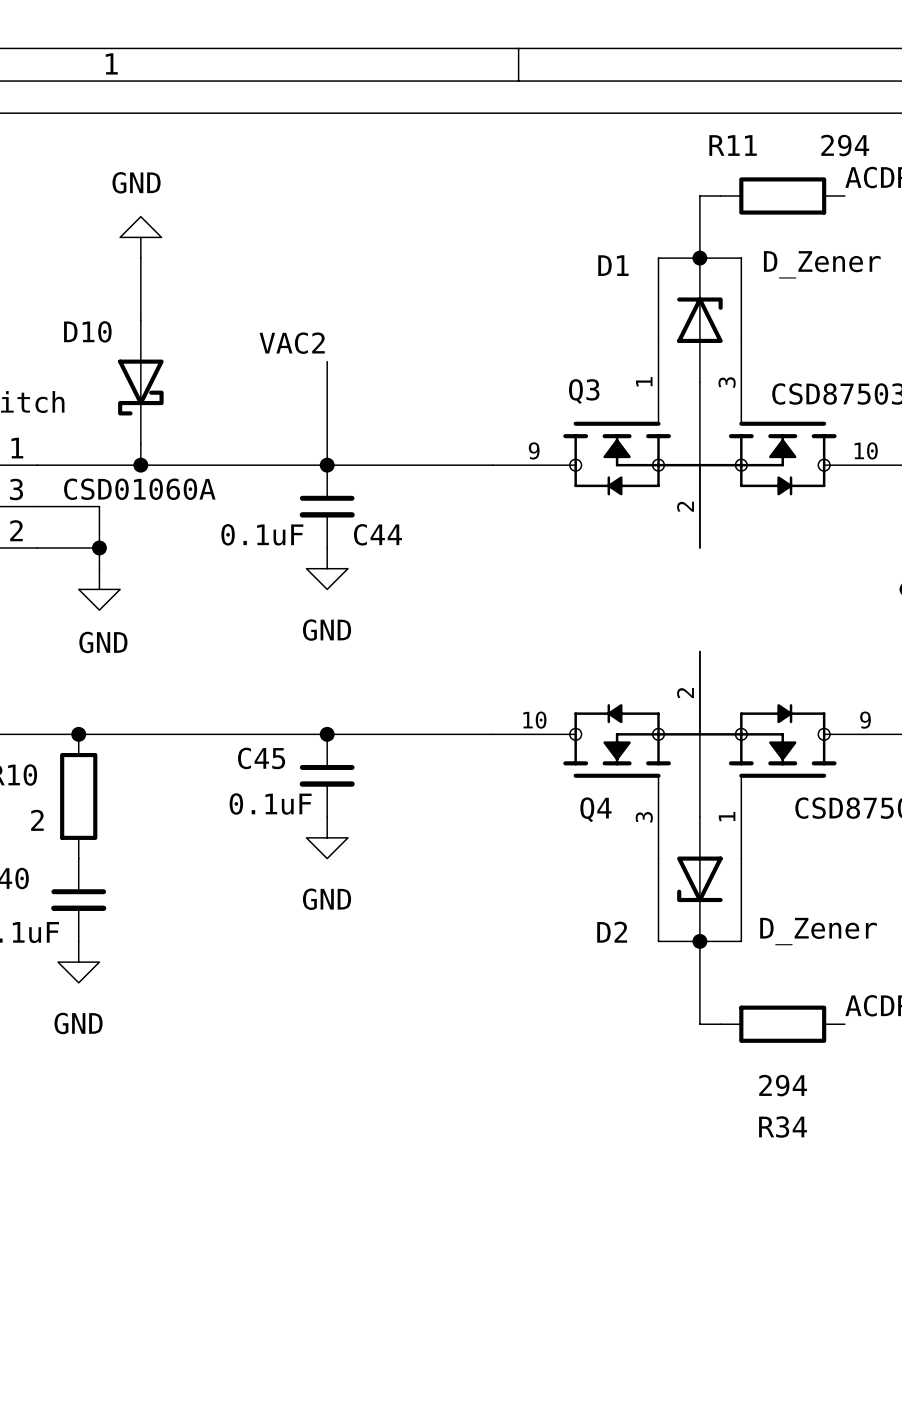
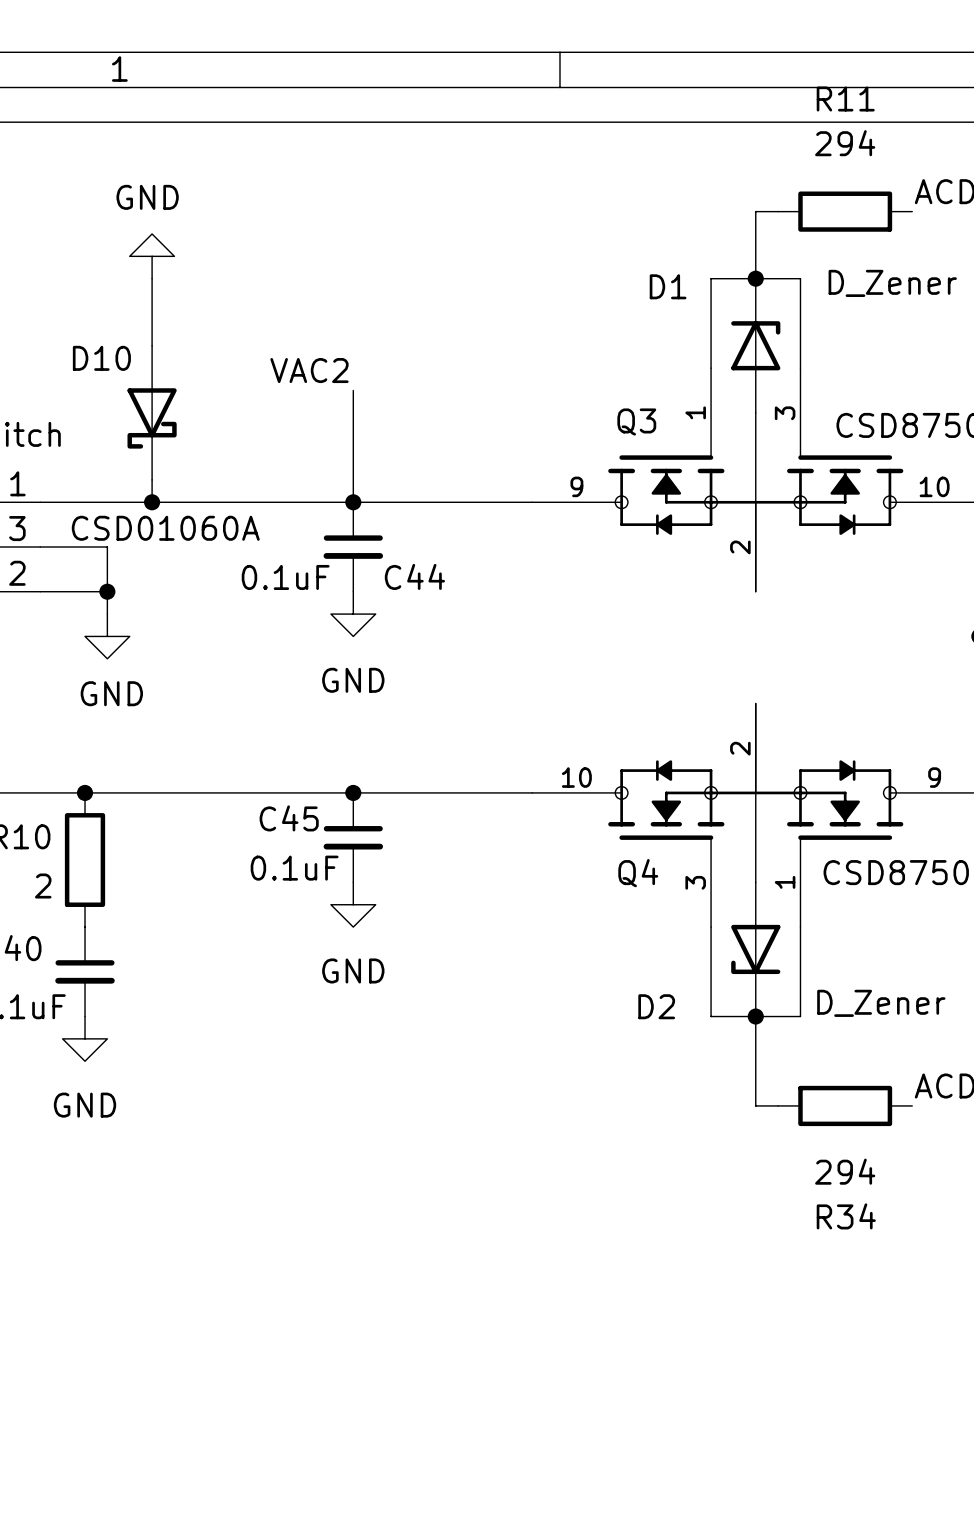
R11 name position: R11 (733, 145) -> R11 (845, 98)
R11 value position: 294 (845, 145) -> 294 (845, 143)

